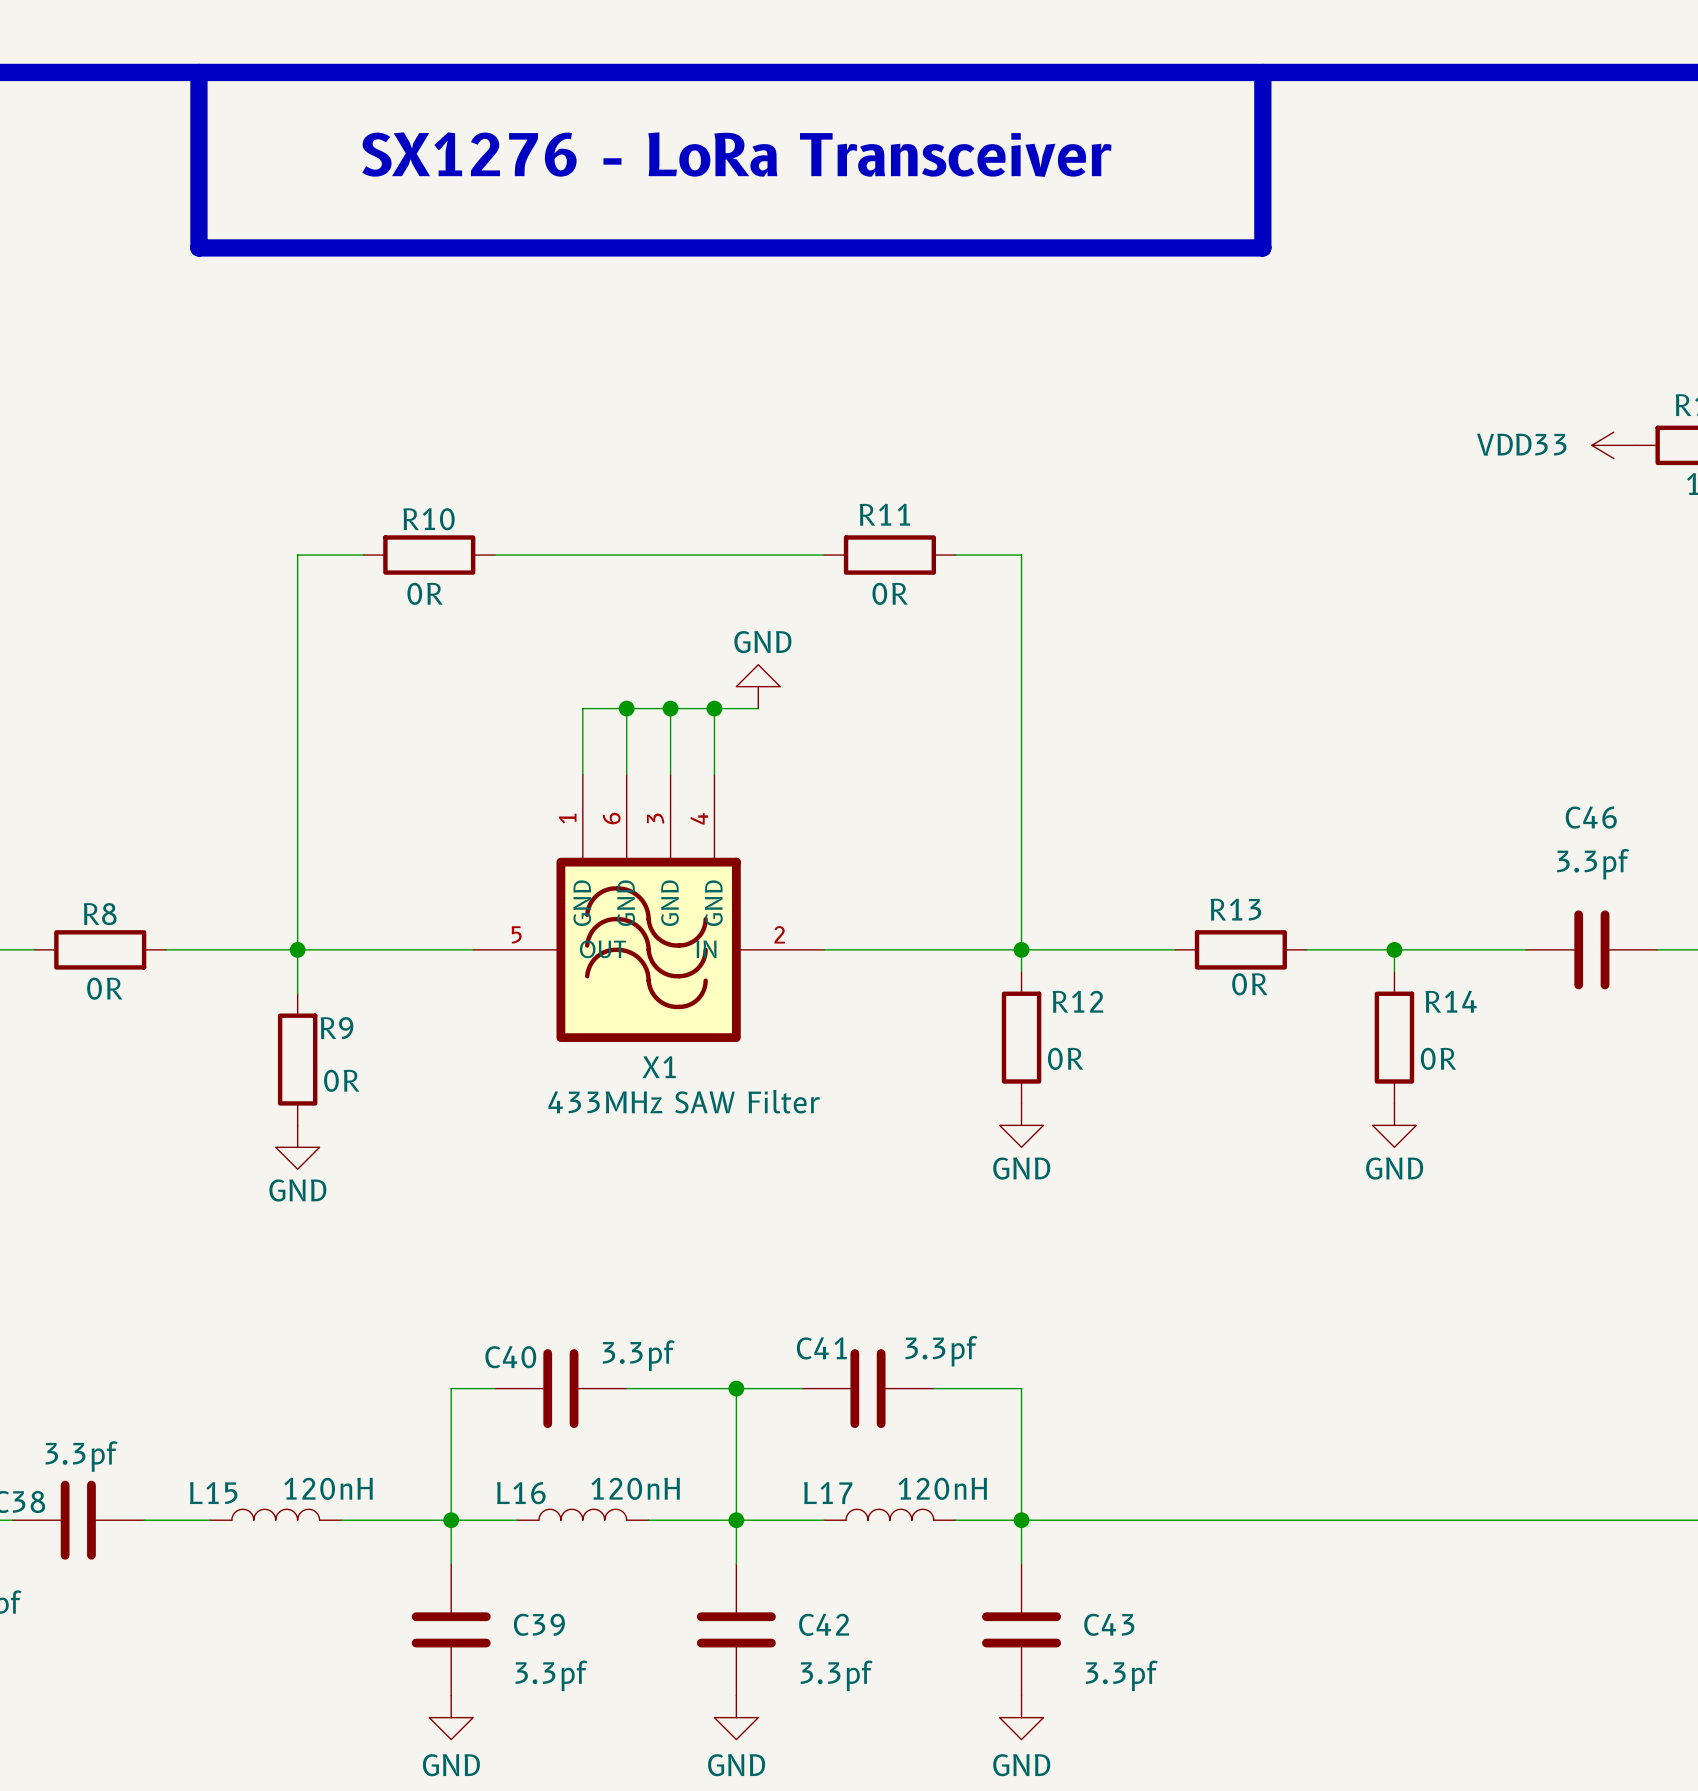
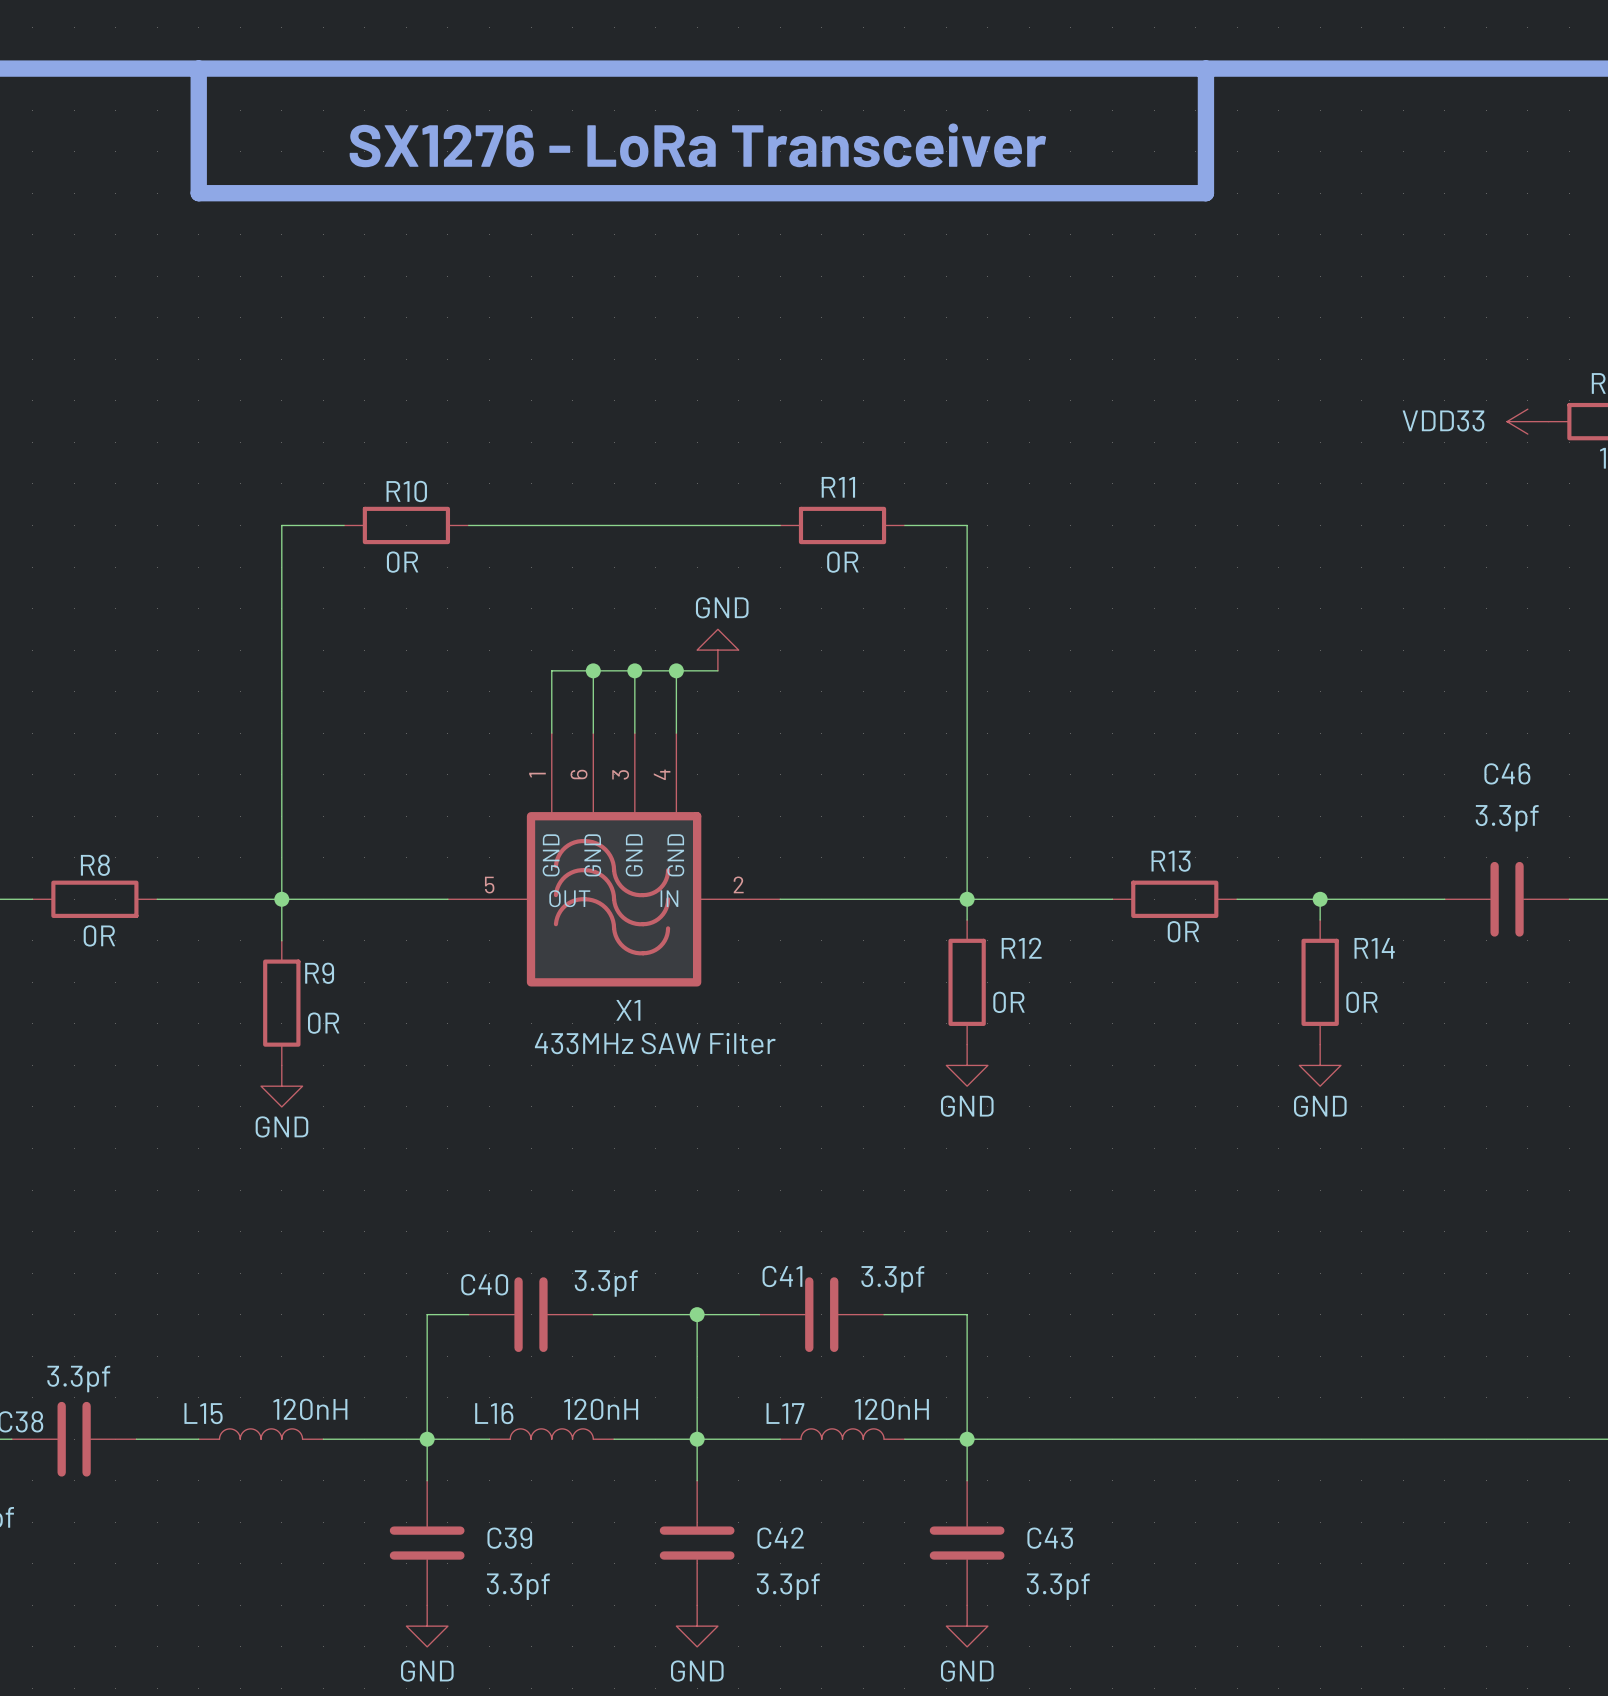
line: (198, 72) (198, 247) (1262, 247) (1262, 72) -> none
line: none -> (198, 68) (198, 193) (1205, 193) (1205, 68)

